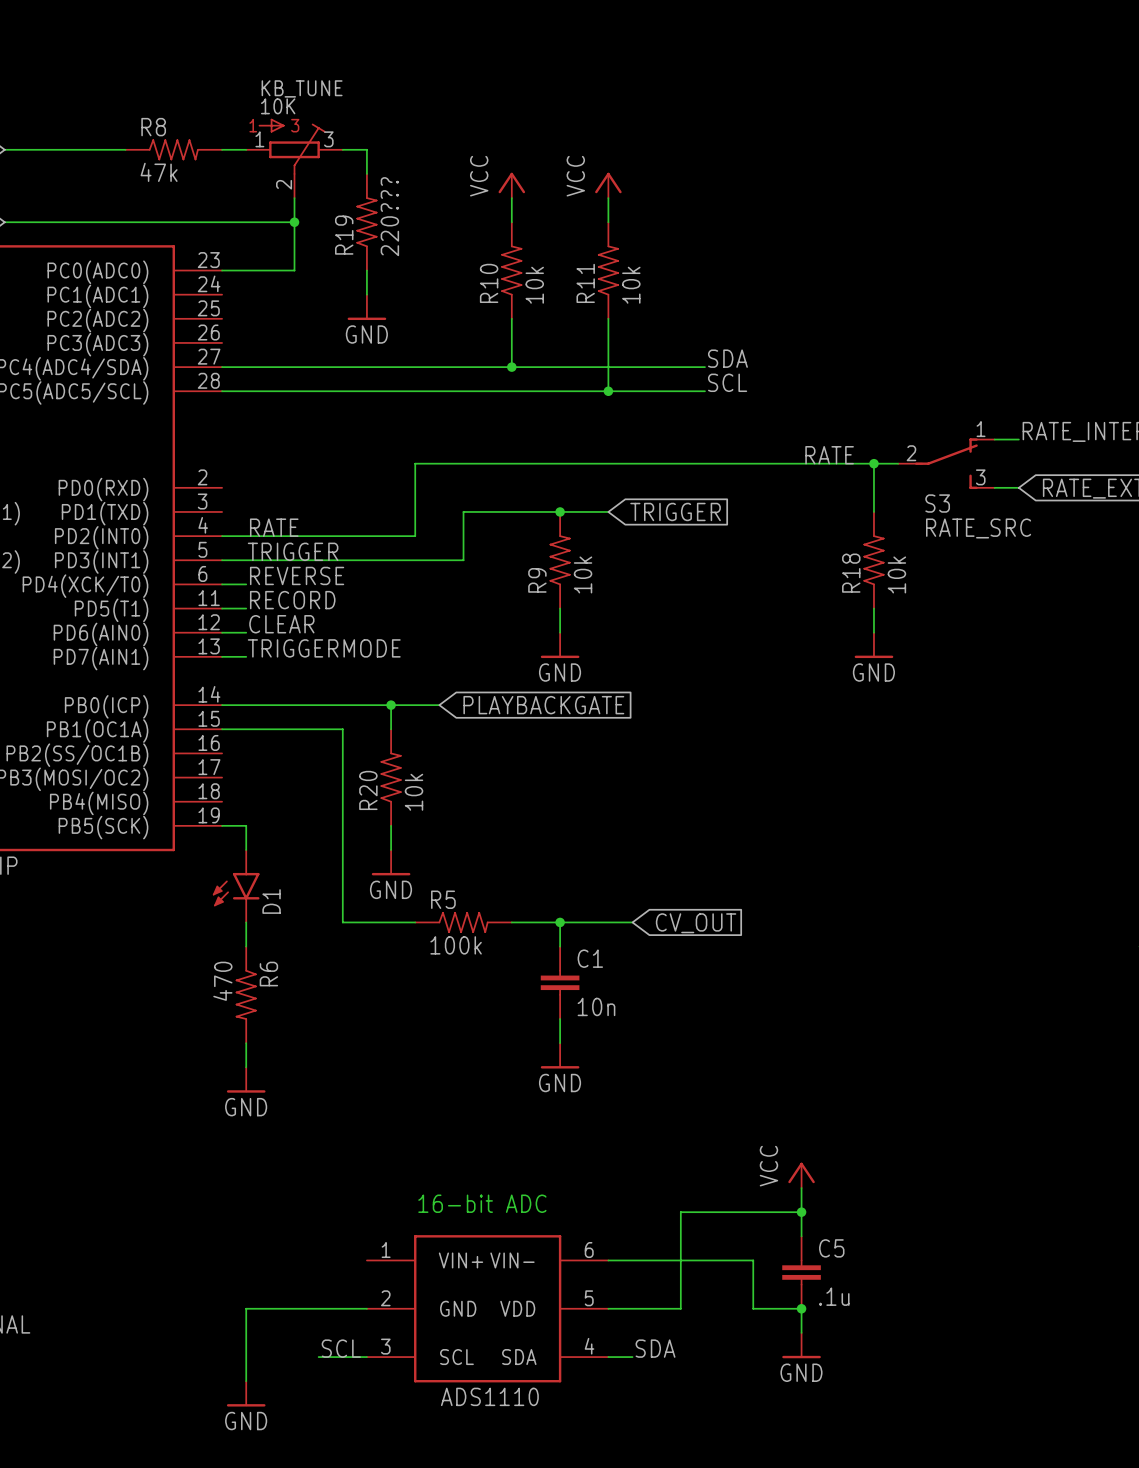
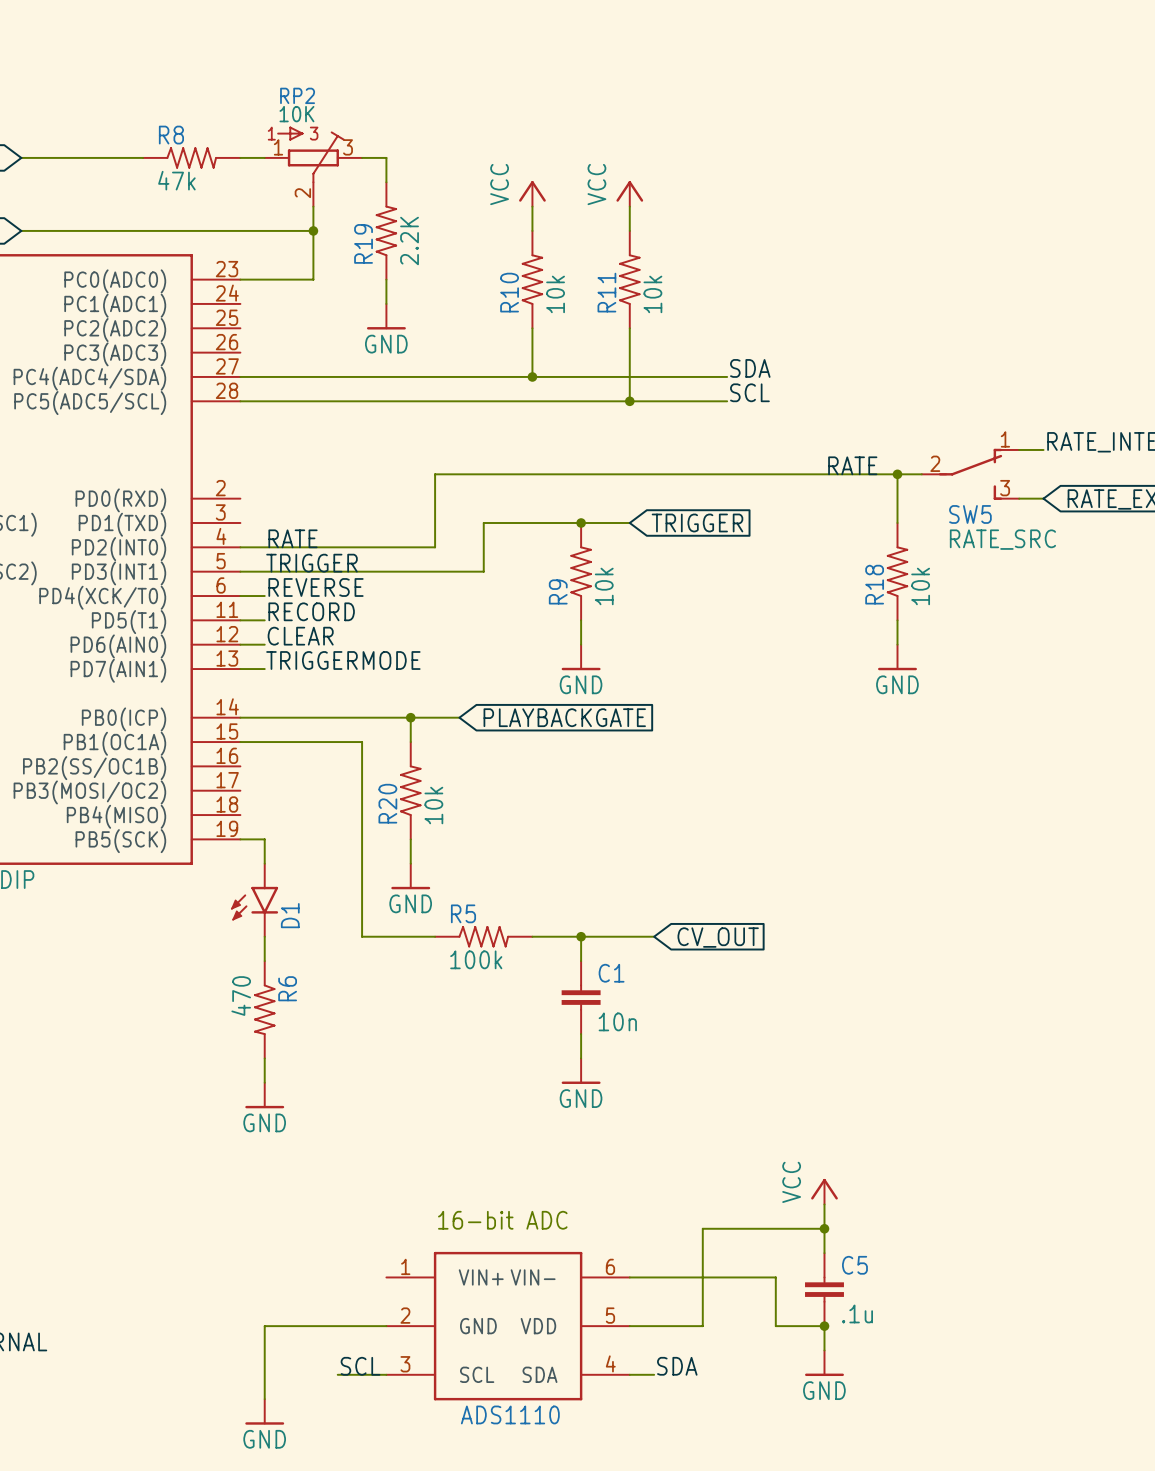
KB_TUNE name: KB_TUNE (302, 88) -> RP2 (297, 95)
R19 value: 220??? (389, 216) -> 2.2K (409, 241)
S3 name: S3 (937, 503) -> SW5 (970, 514)

